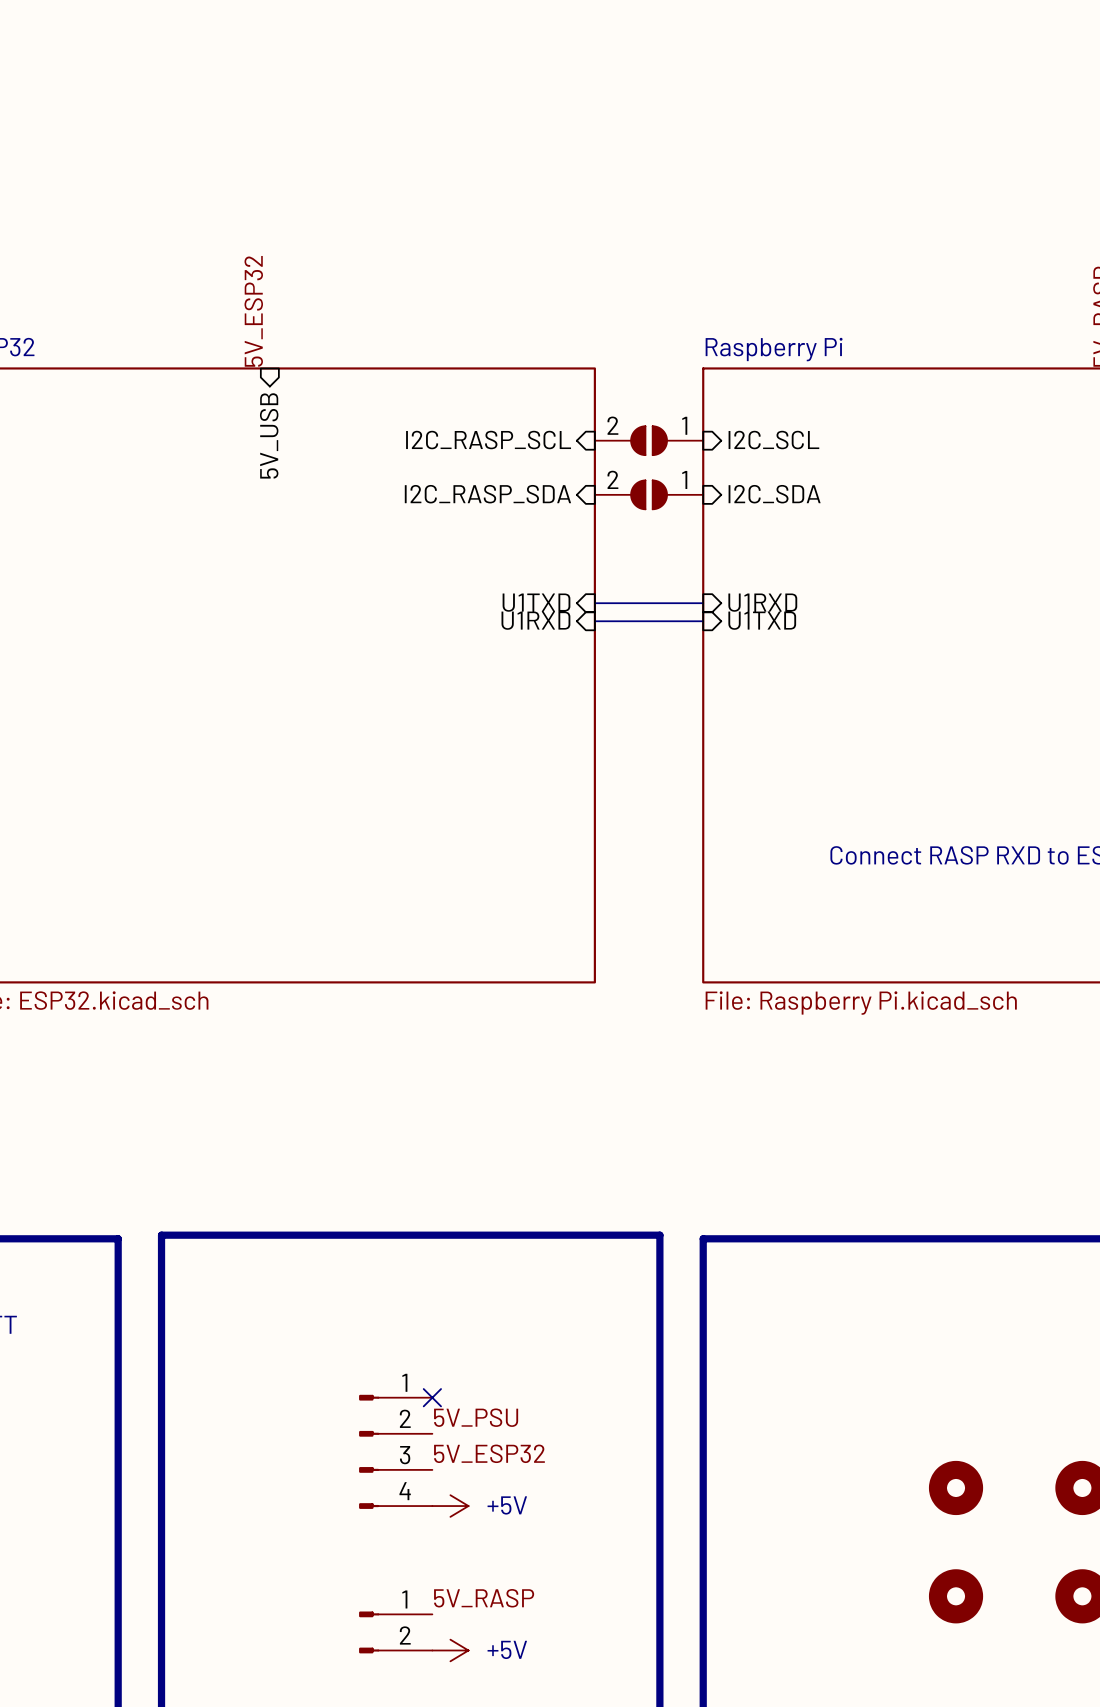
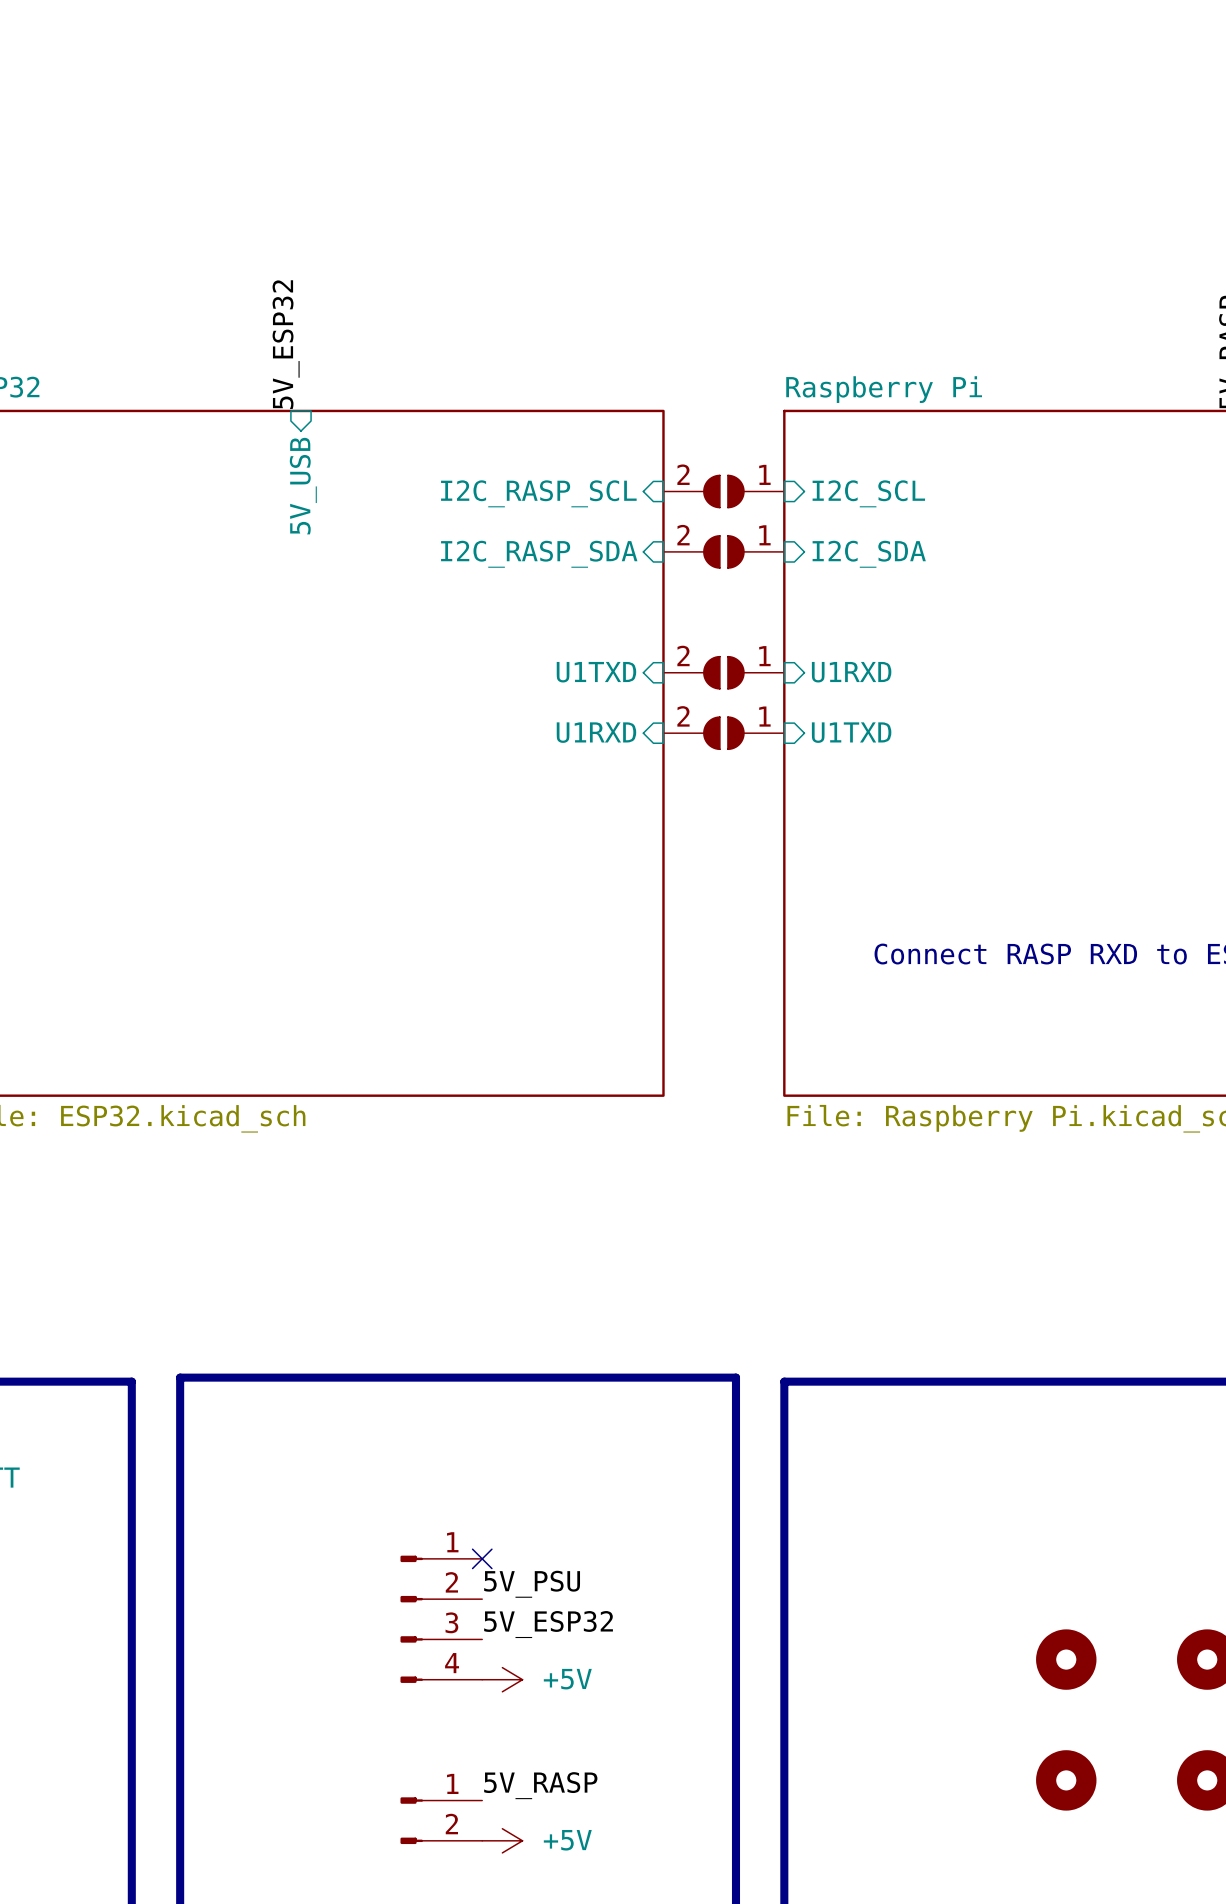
part: none -> (723, 672)
sheet pin position: U1RXD (535, 620) -> U1RXD (596, 732)
sheet pin position: U1TXD (762, 620) -> U1TXD (851, 732)
wire: (594, 621) (703, 621) -> none
part: none -> (723, 733)

